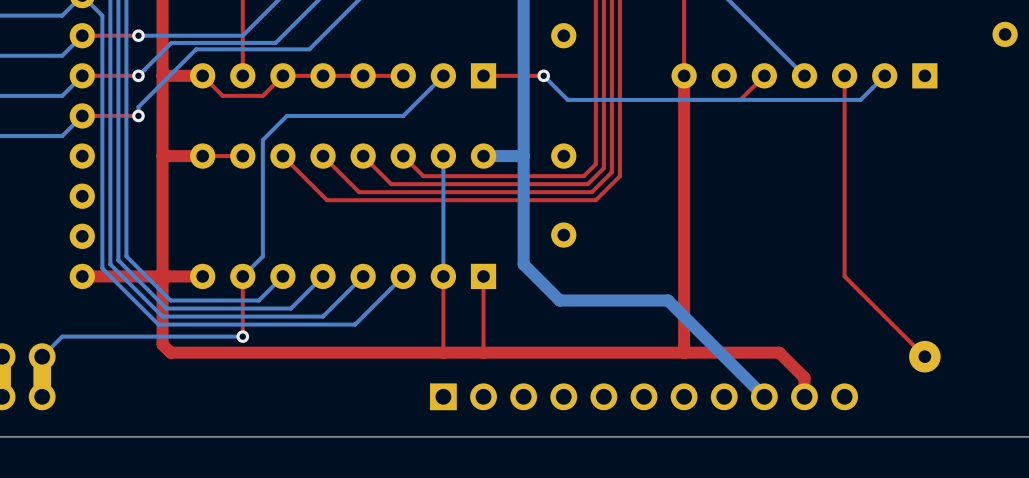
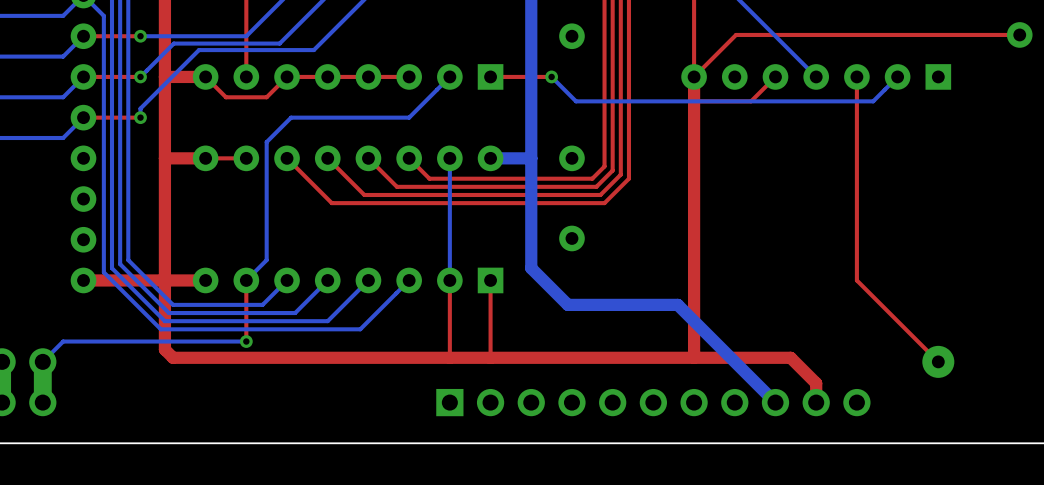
top track: none -> (1019, 34) (736, 34) (694, 76)

